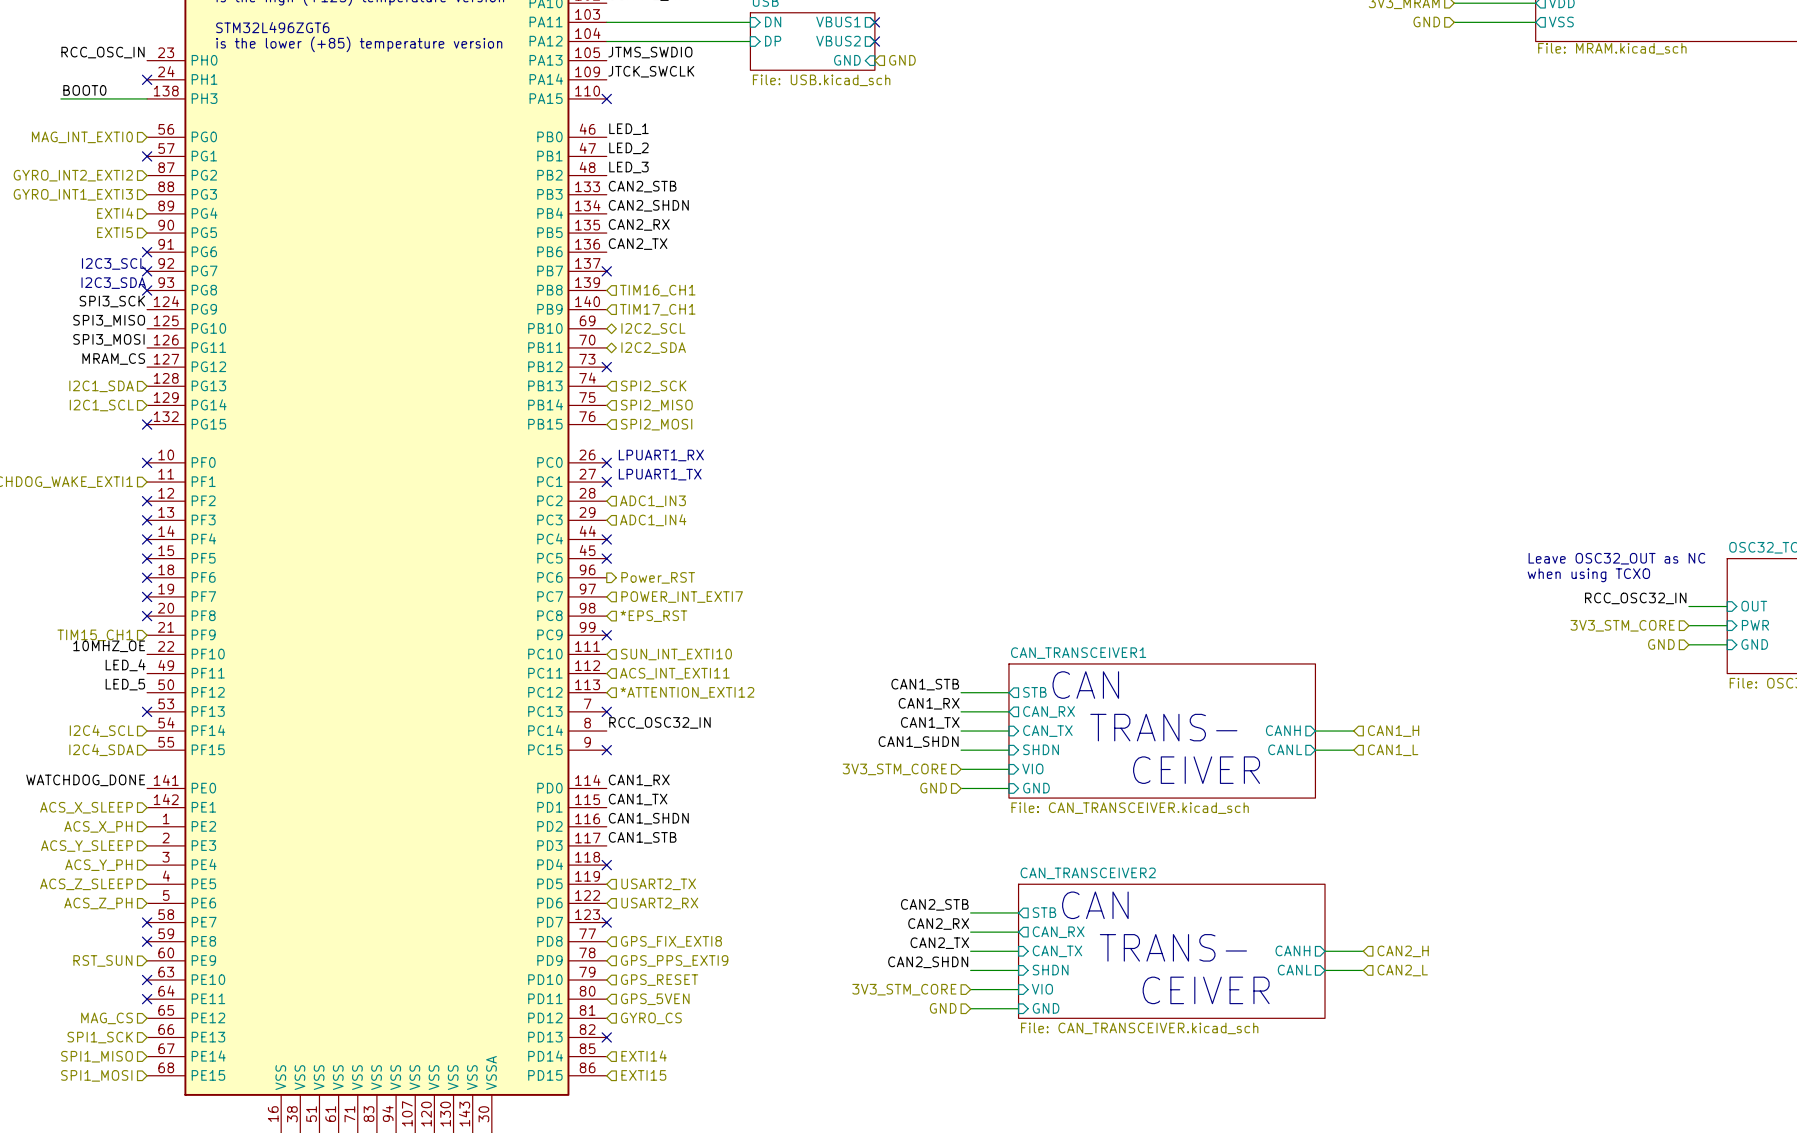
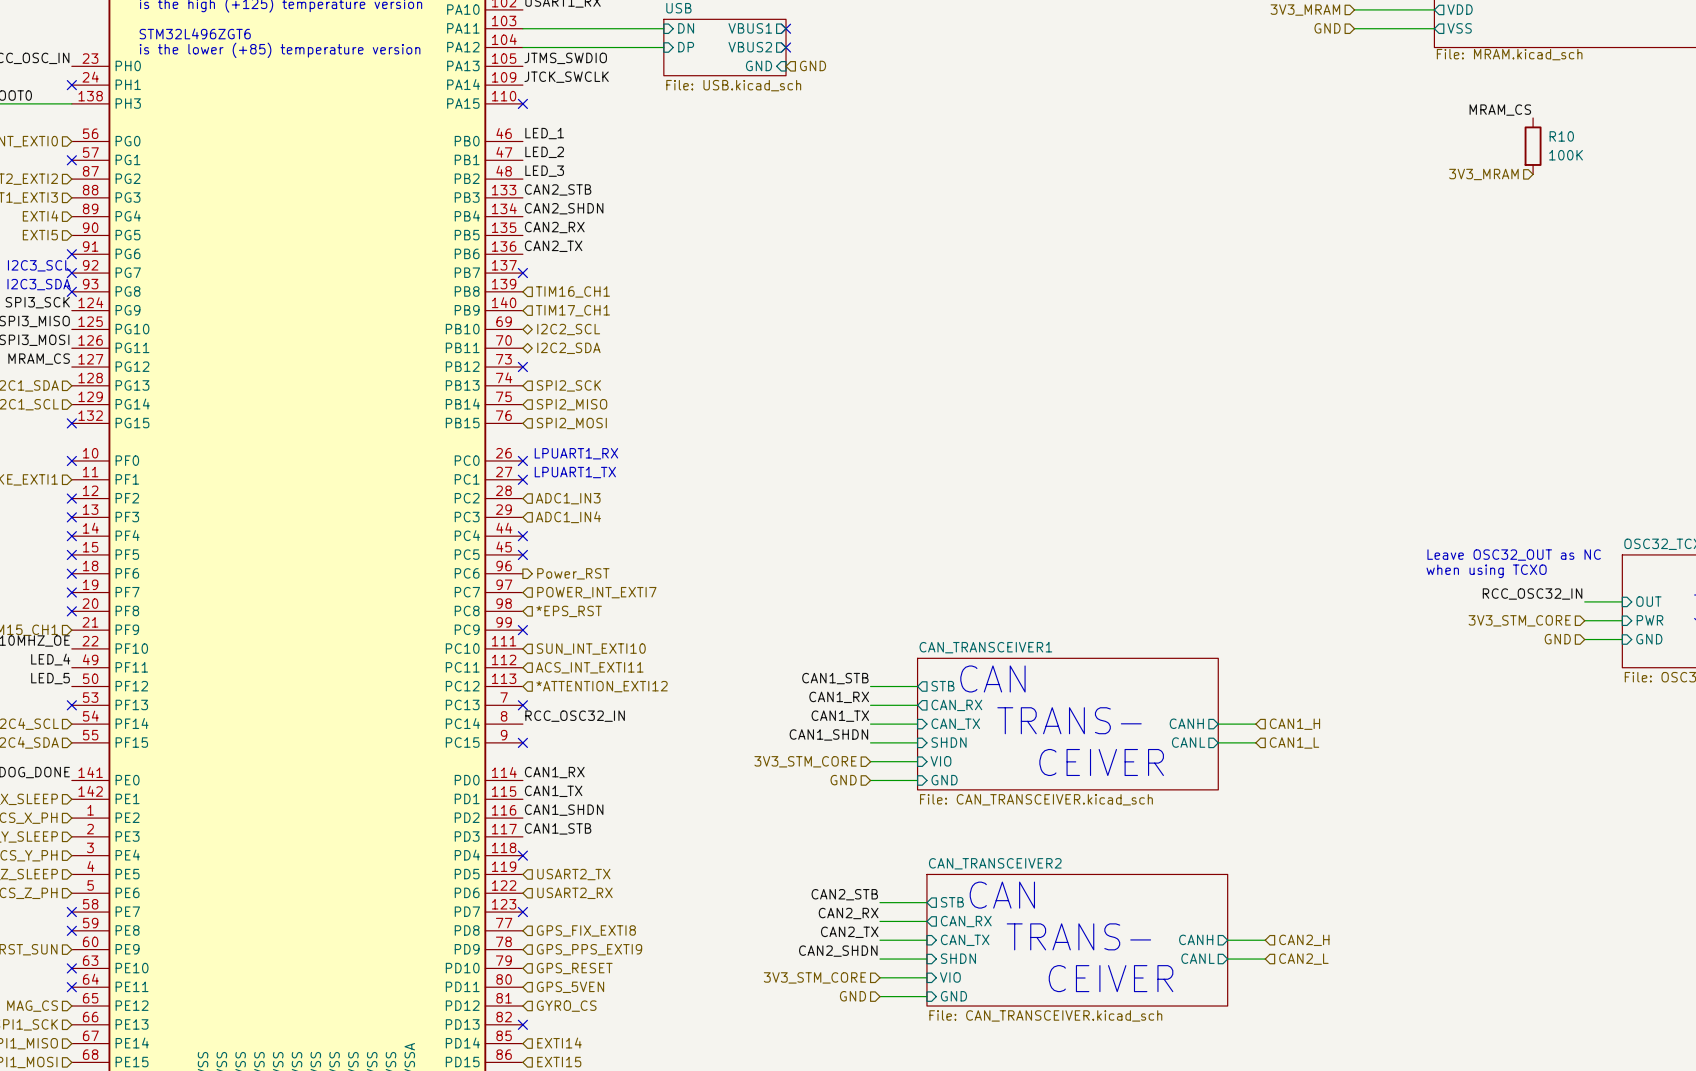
label: none -> MRAM_CS (1500, 110)
R10: none -> 100K (1533, 146)
hierarchical label: none -> 3V3_MRAM (1483, 174)

